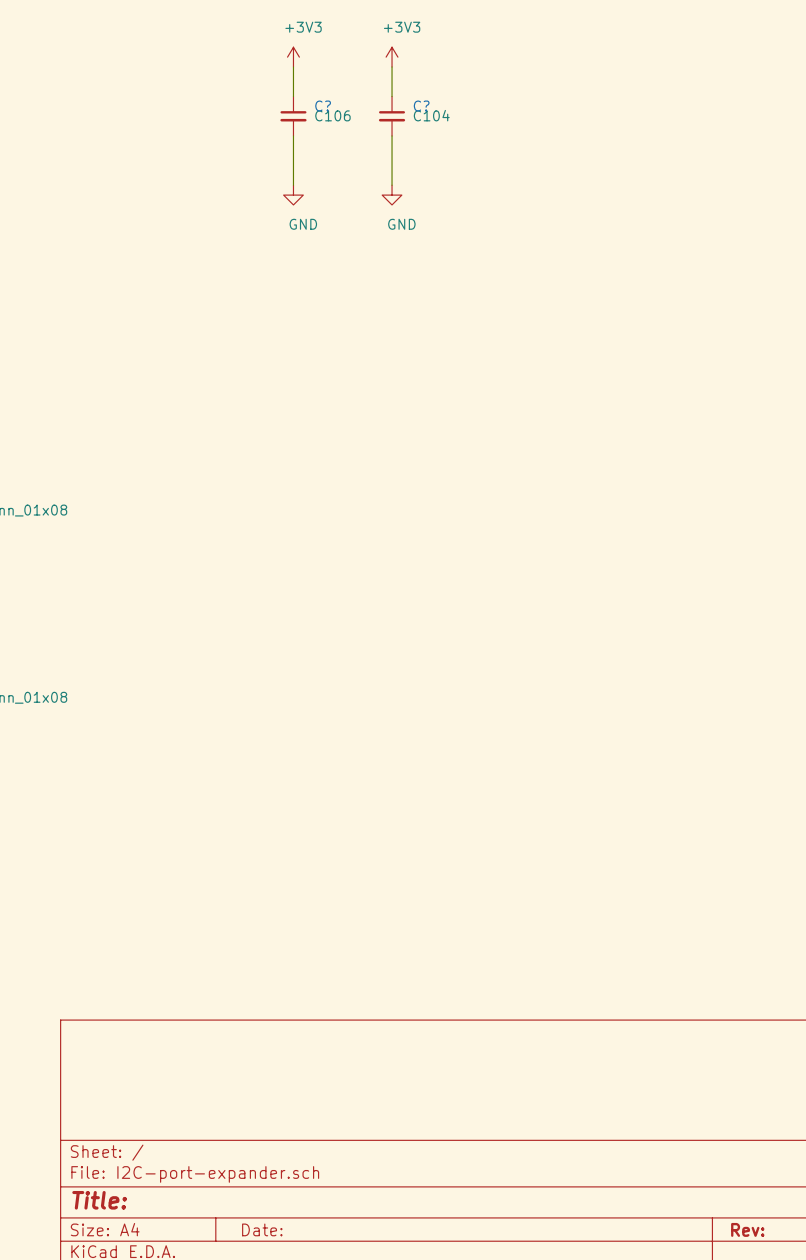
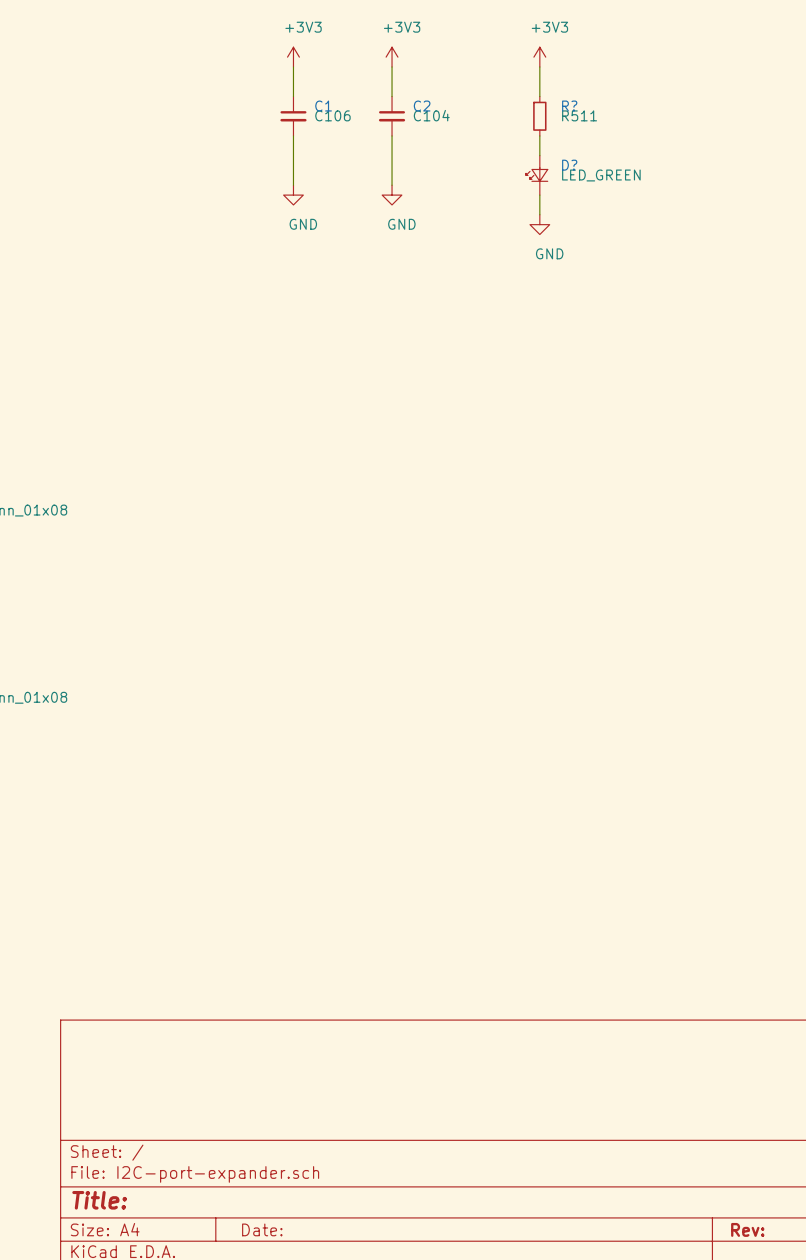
power symbol: none -> +3V3 (539, 57)
wire: none -> (539, 66) (539, 96)
C? name: C? (323, 106) -> C1 (323, 106)
C? name: C? (421, 106) -> C2 (422, 106)
R?: none -> R511 (539, 116)
wire: none -> (539, 135) (539, 155)
D?: none -> LED_GREEN (536, 175)
wire: none -> (539, 195) (539, 214)
power symbol: none -> GND (539, 224)

